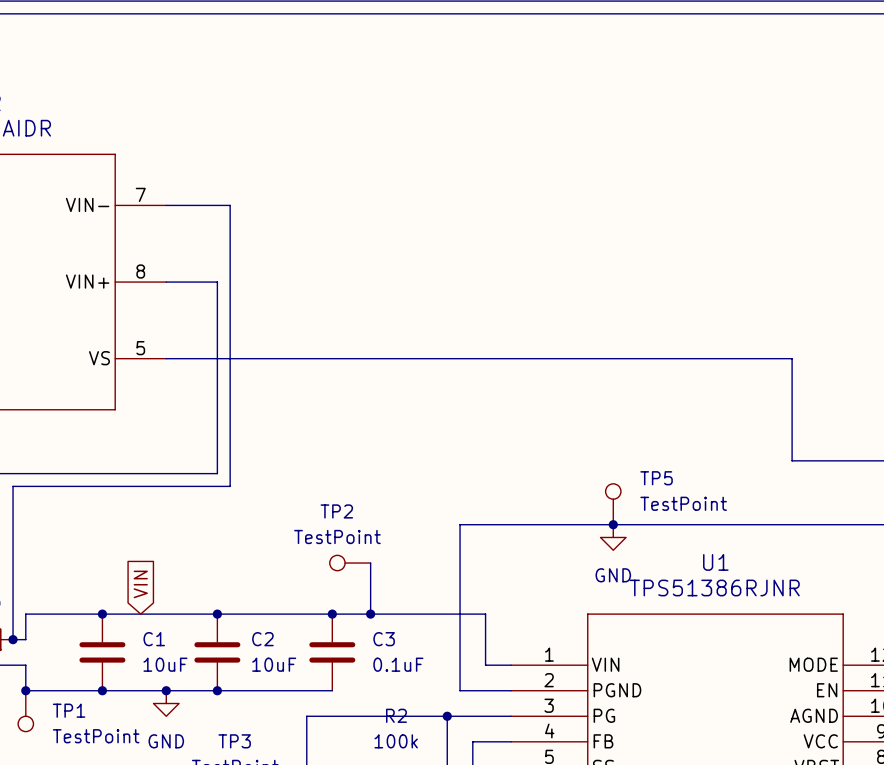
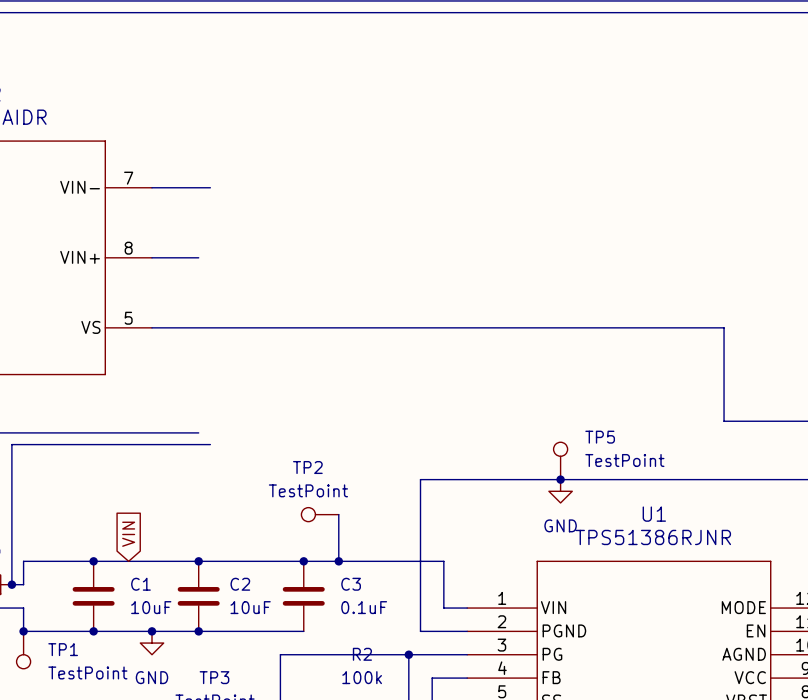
wire: (230, 205) (230, 486) -> none
wire: (217, 282) (217, 473) -> none

